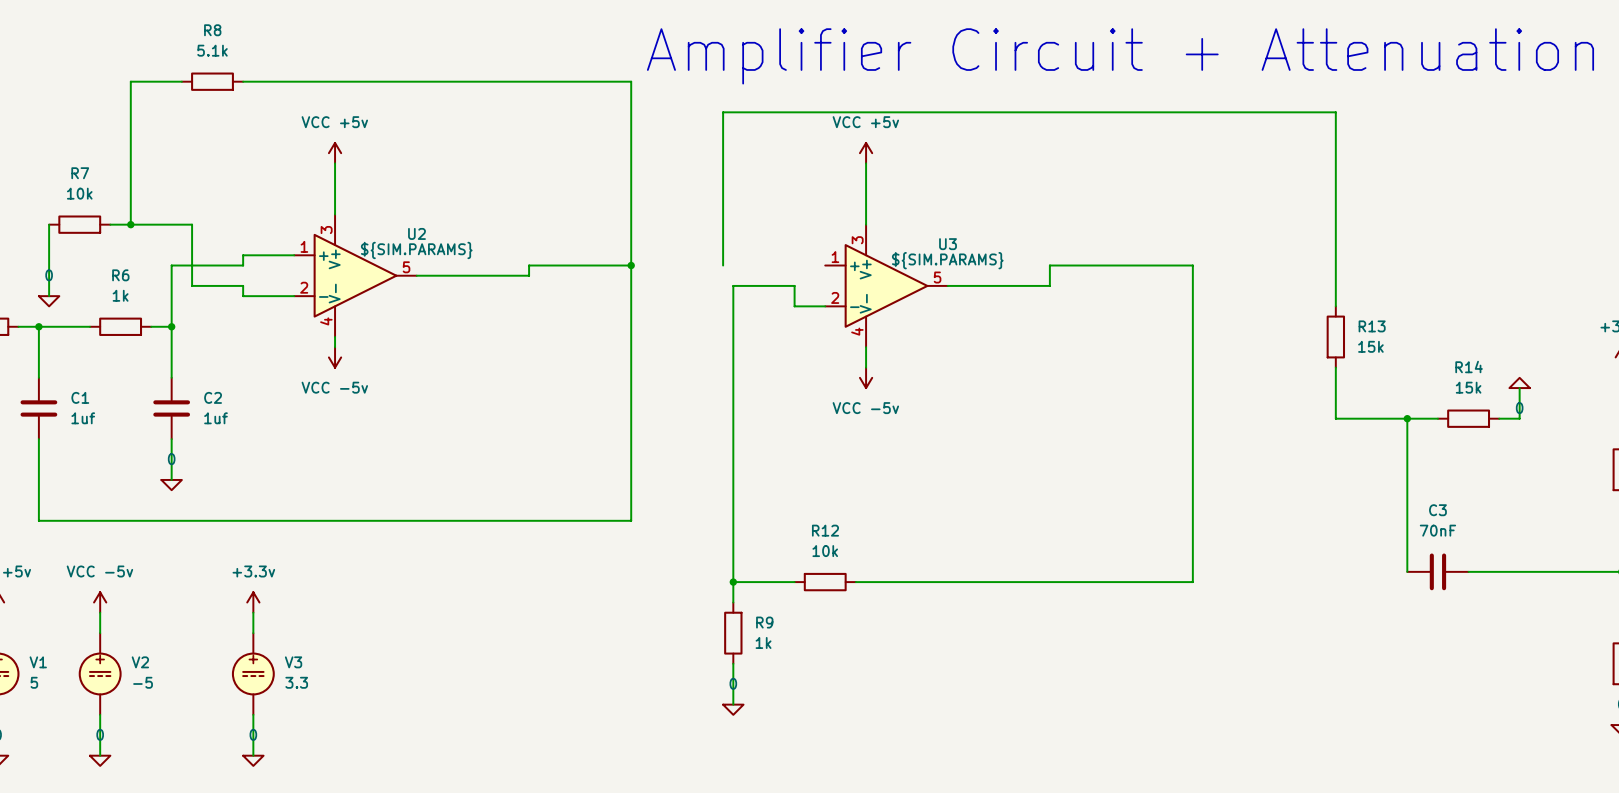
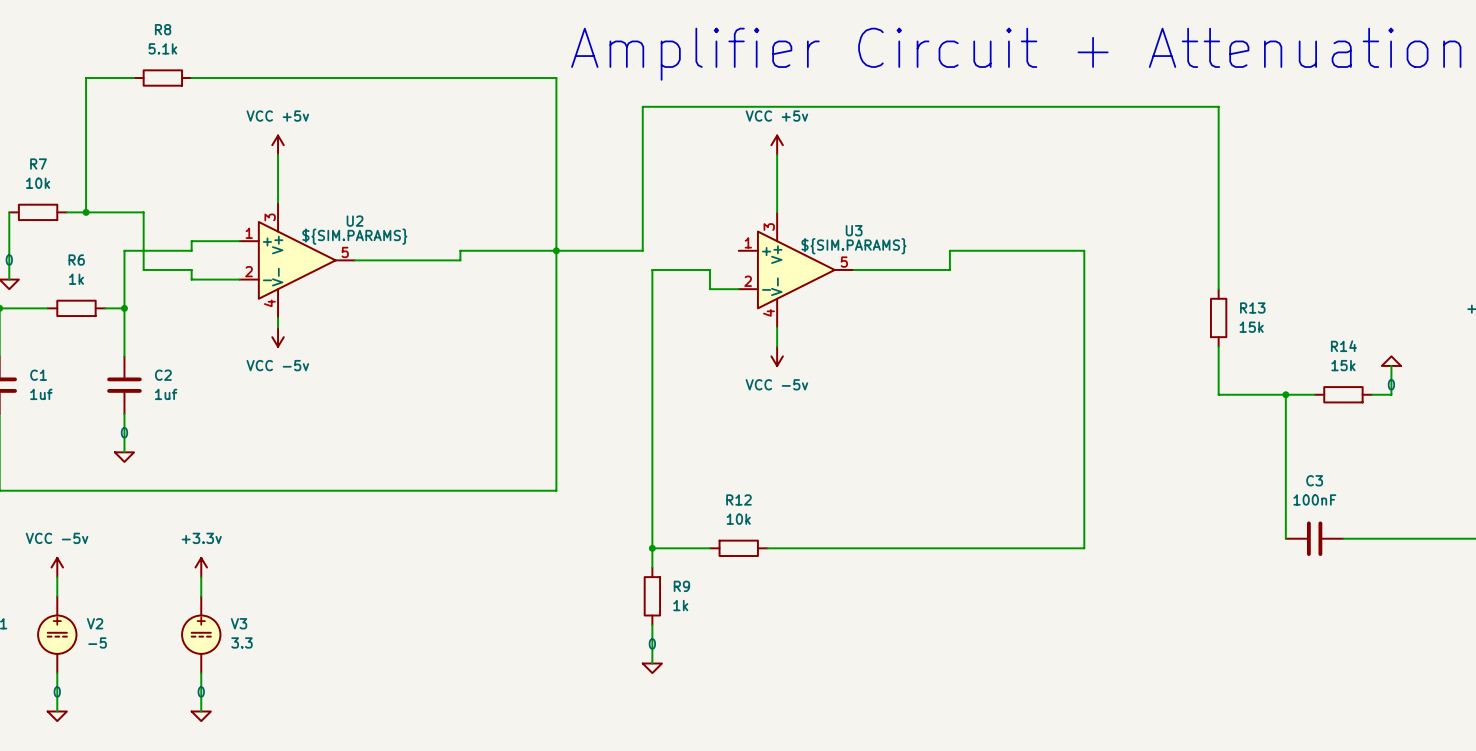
wire: none -> (556, 250) (642, 250)
C3 value: 70nF (1437, 530) -> 100nF (1314, 499)

